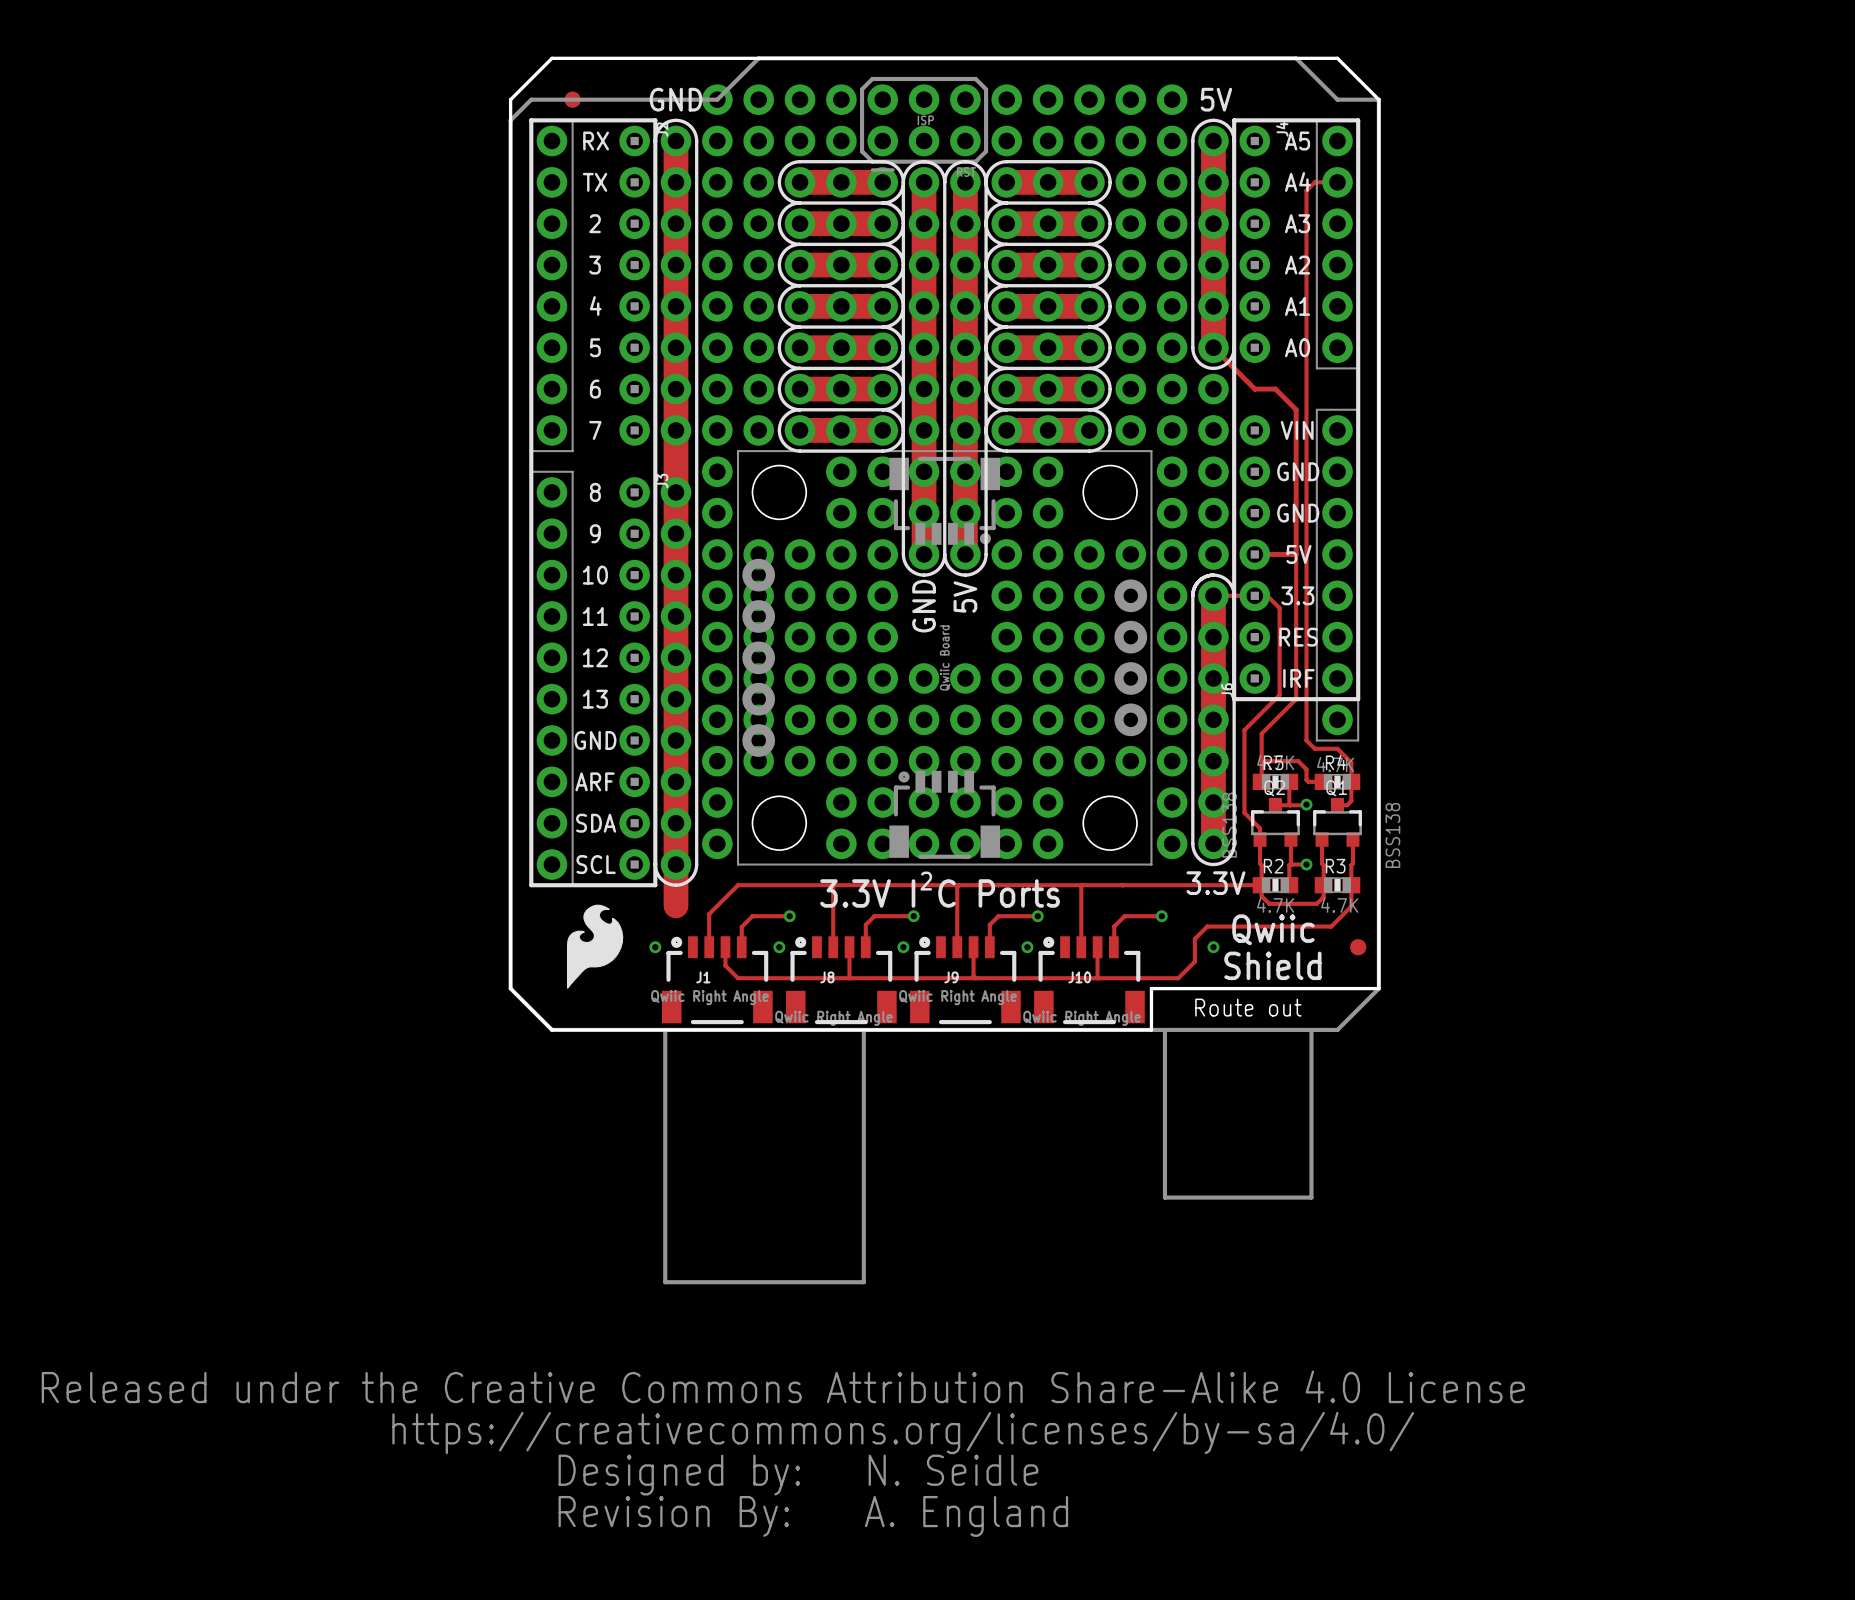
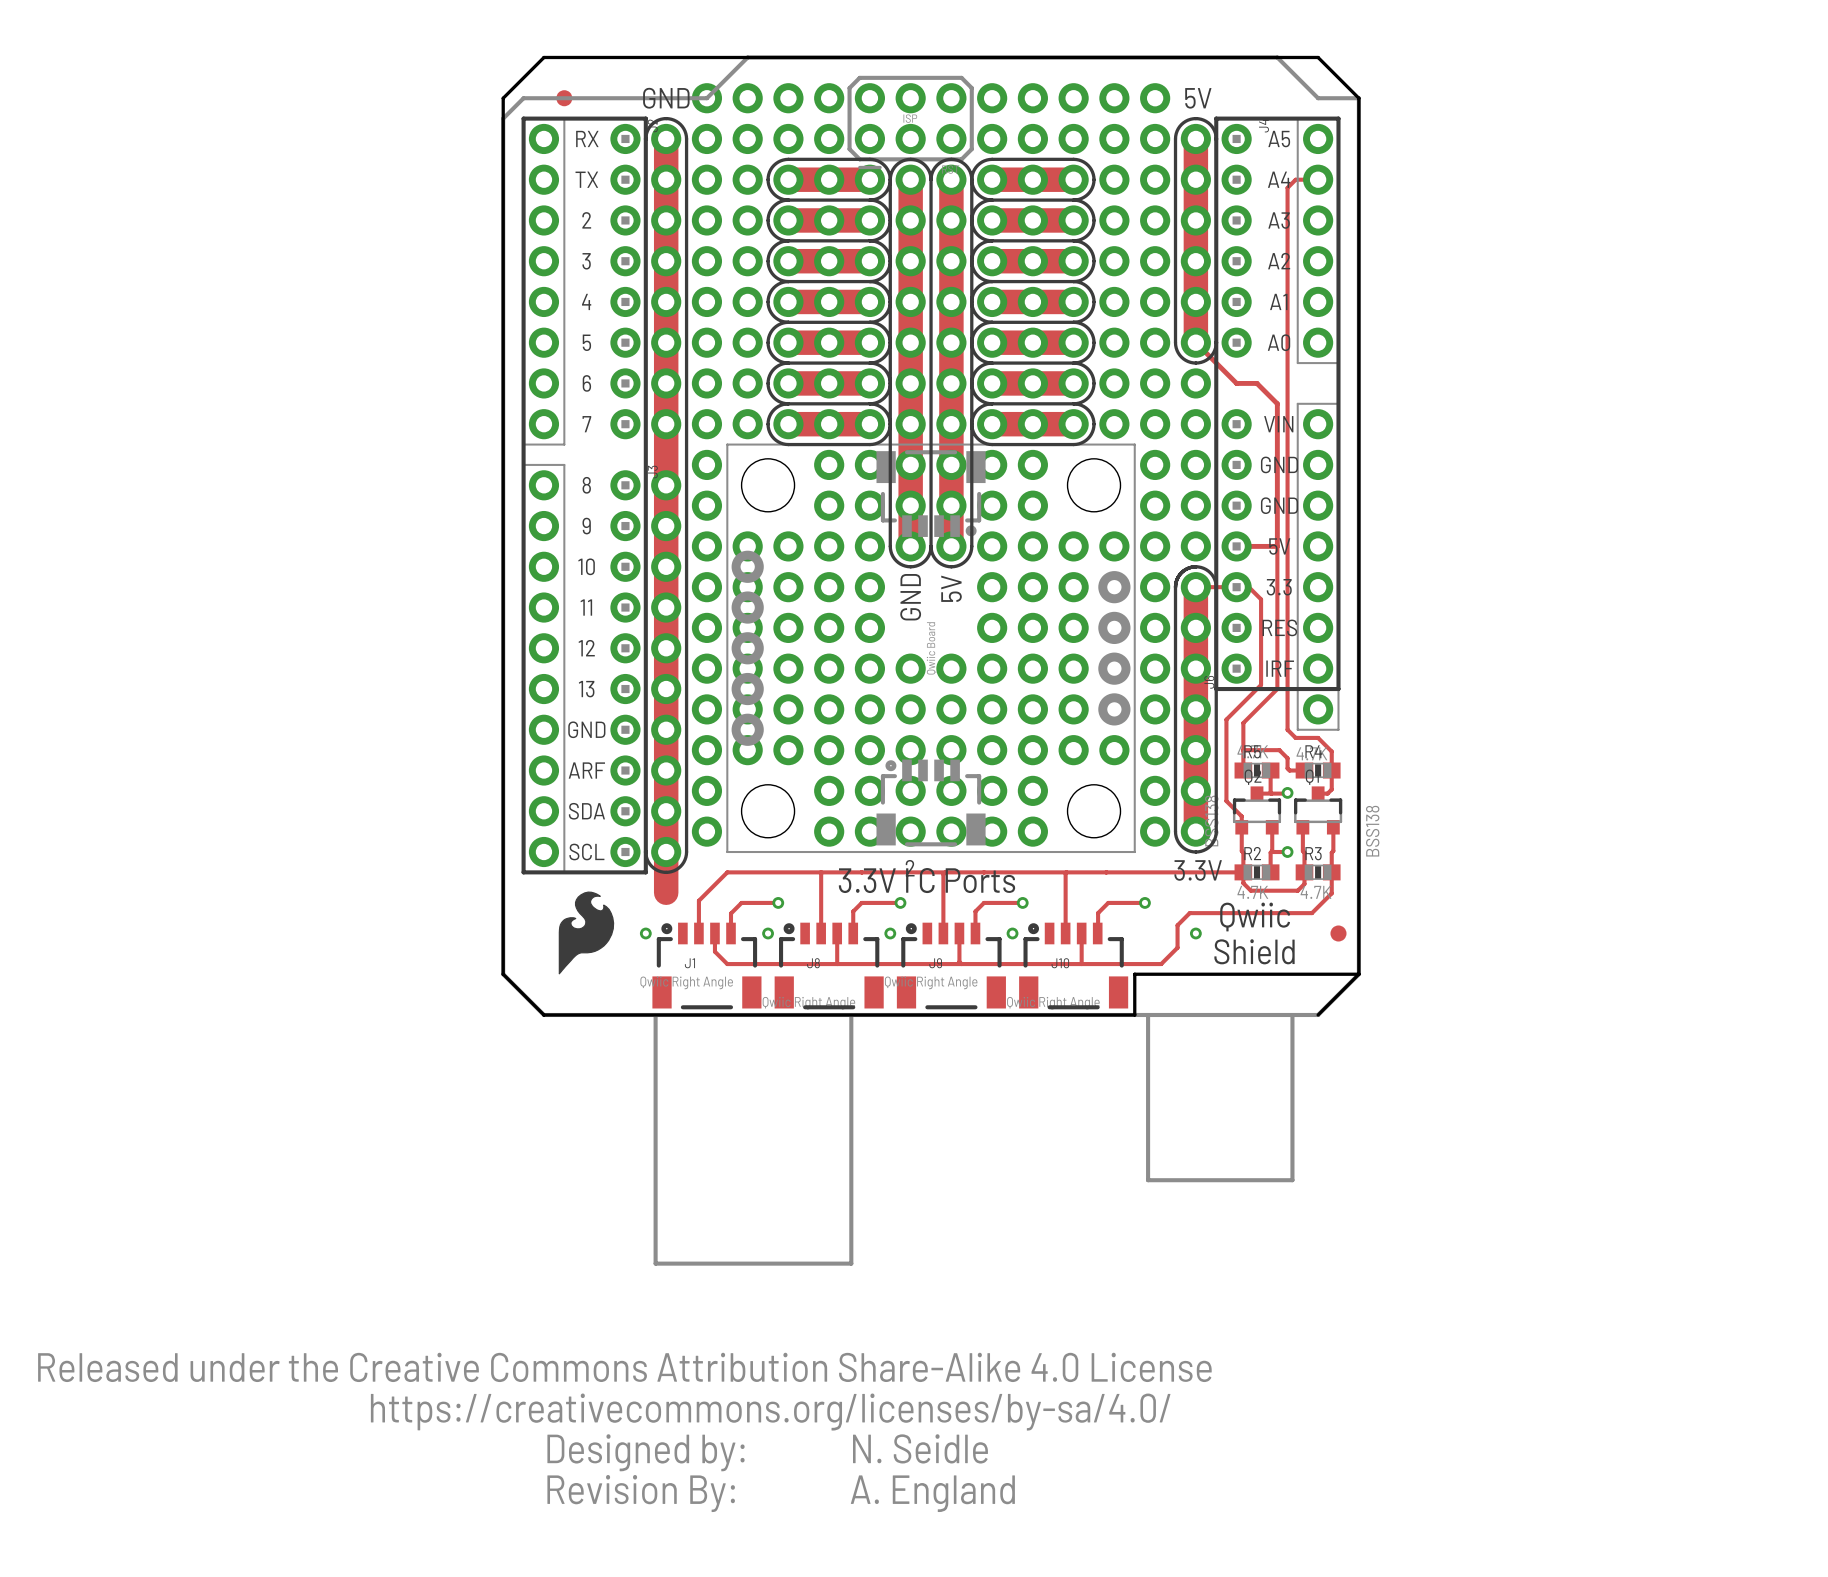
board edge: none -> (1358, 974) (1318, 1014)
text: Route out (1248, 1007) -> none

